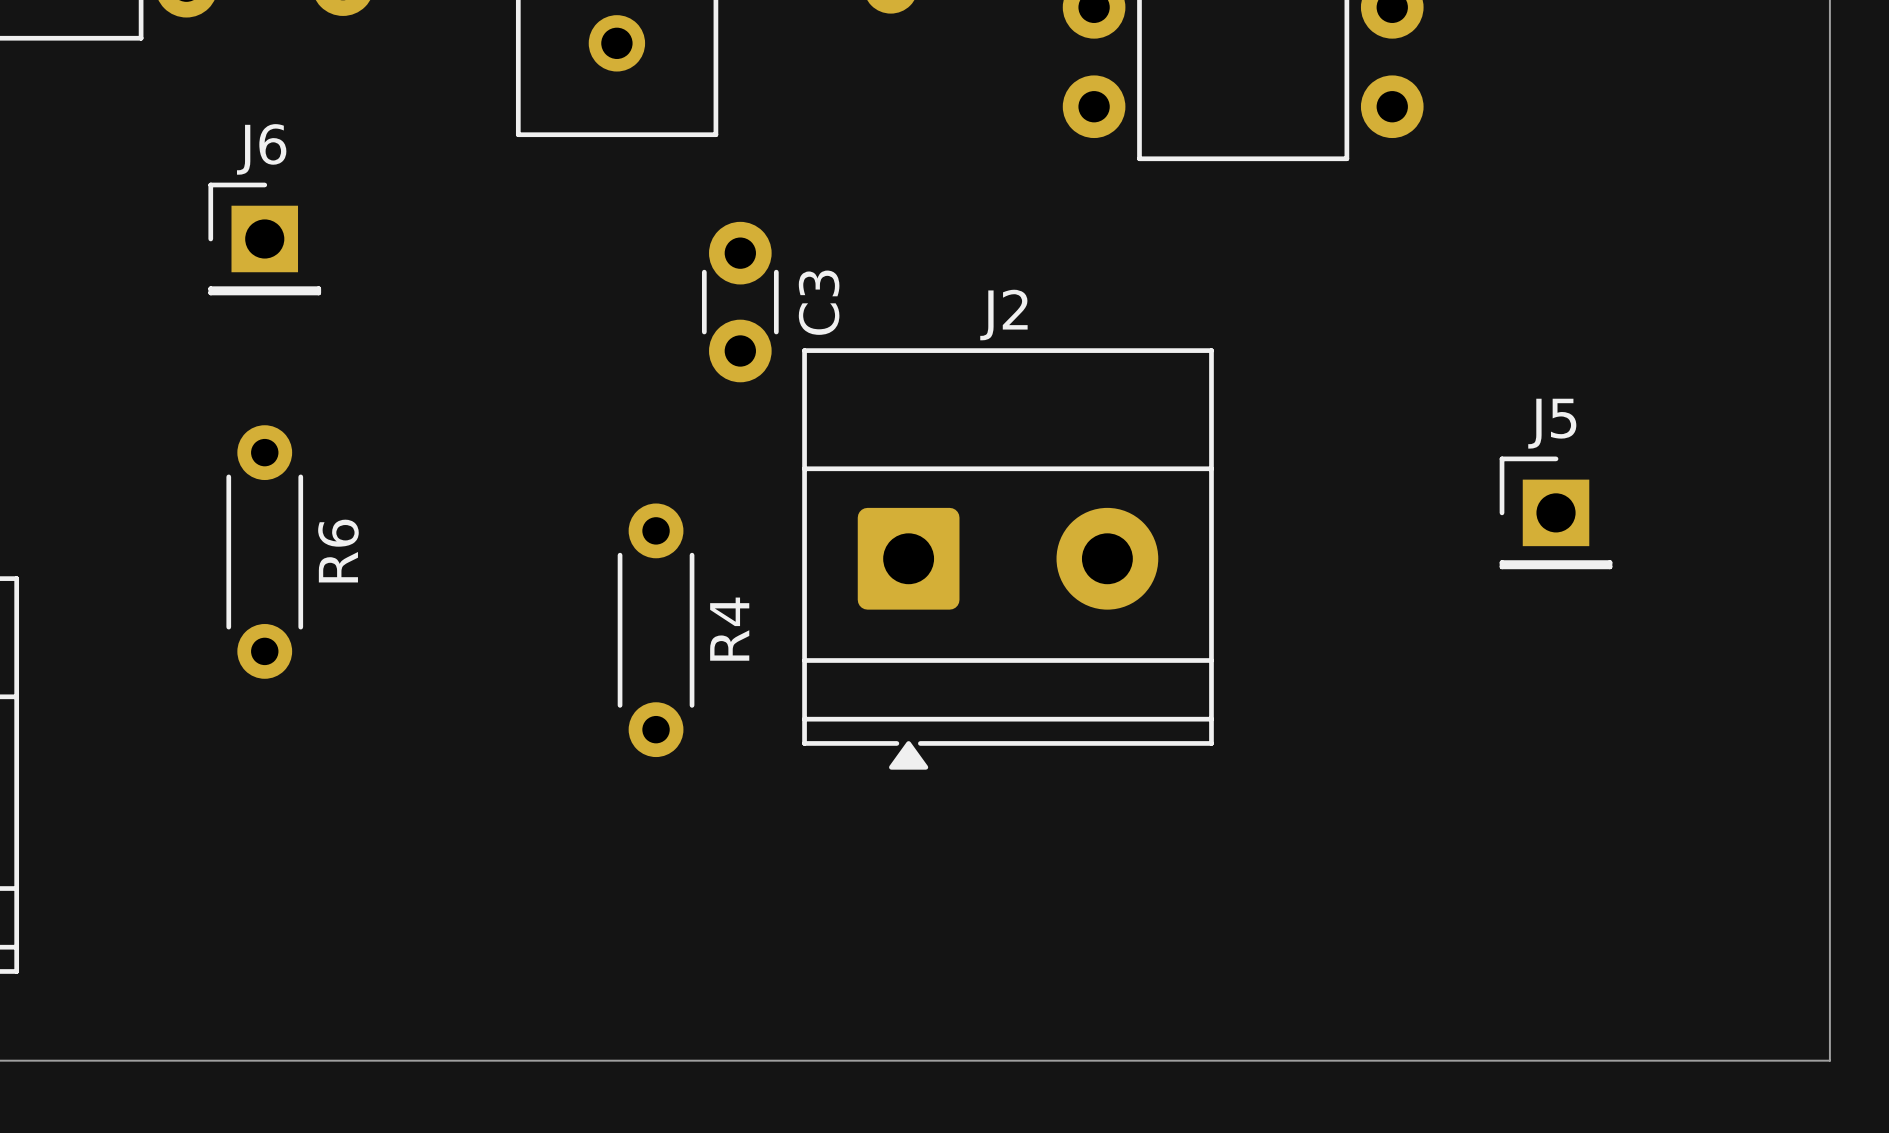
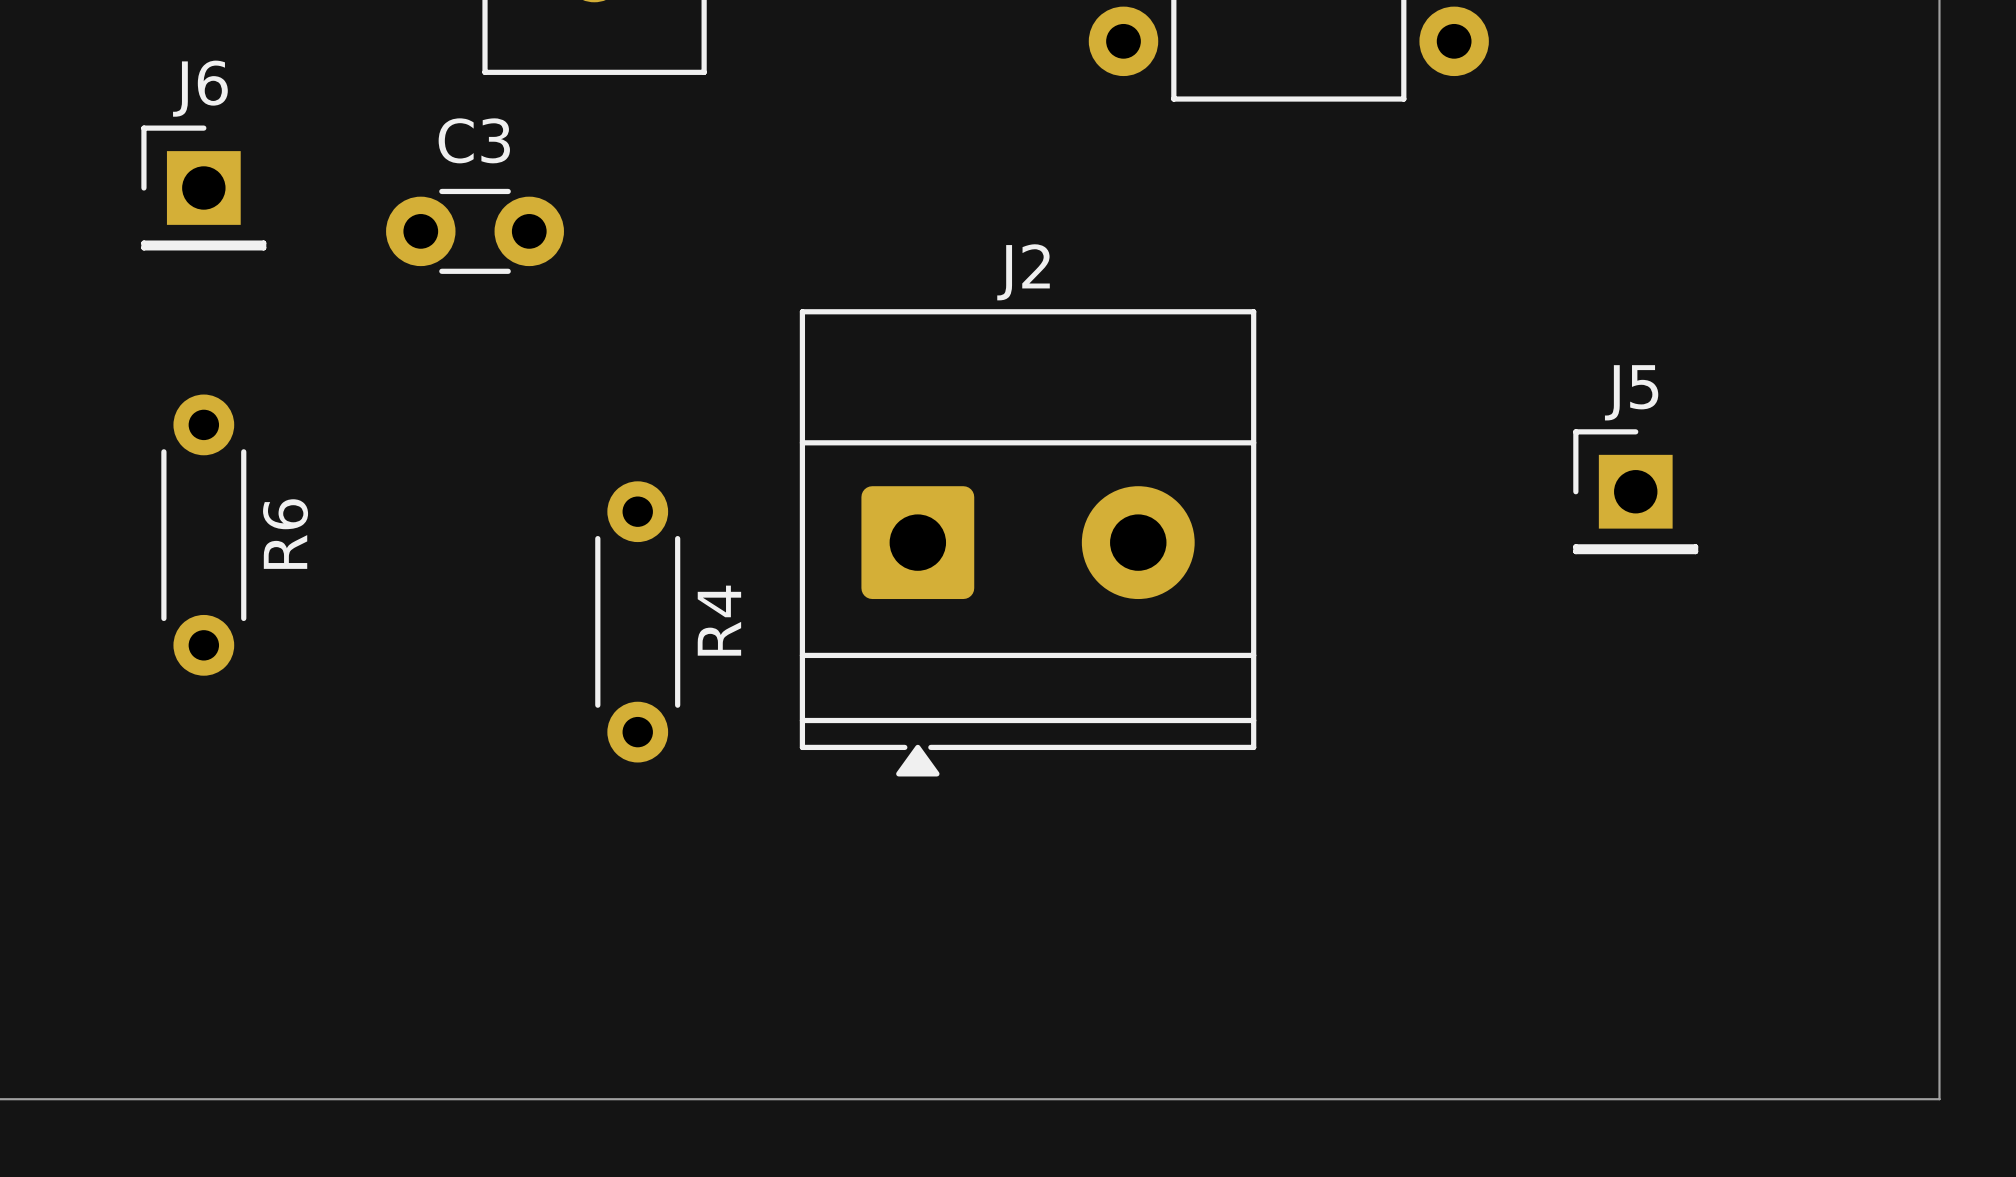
C3 rotation: 0° (740, 302) -> 90° clockwise (475, 231)
C3 position: (740, 302) -> (475, 231)
C3 name position: C3 (819, 302) -> C3 (474, 140)

